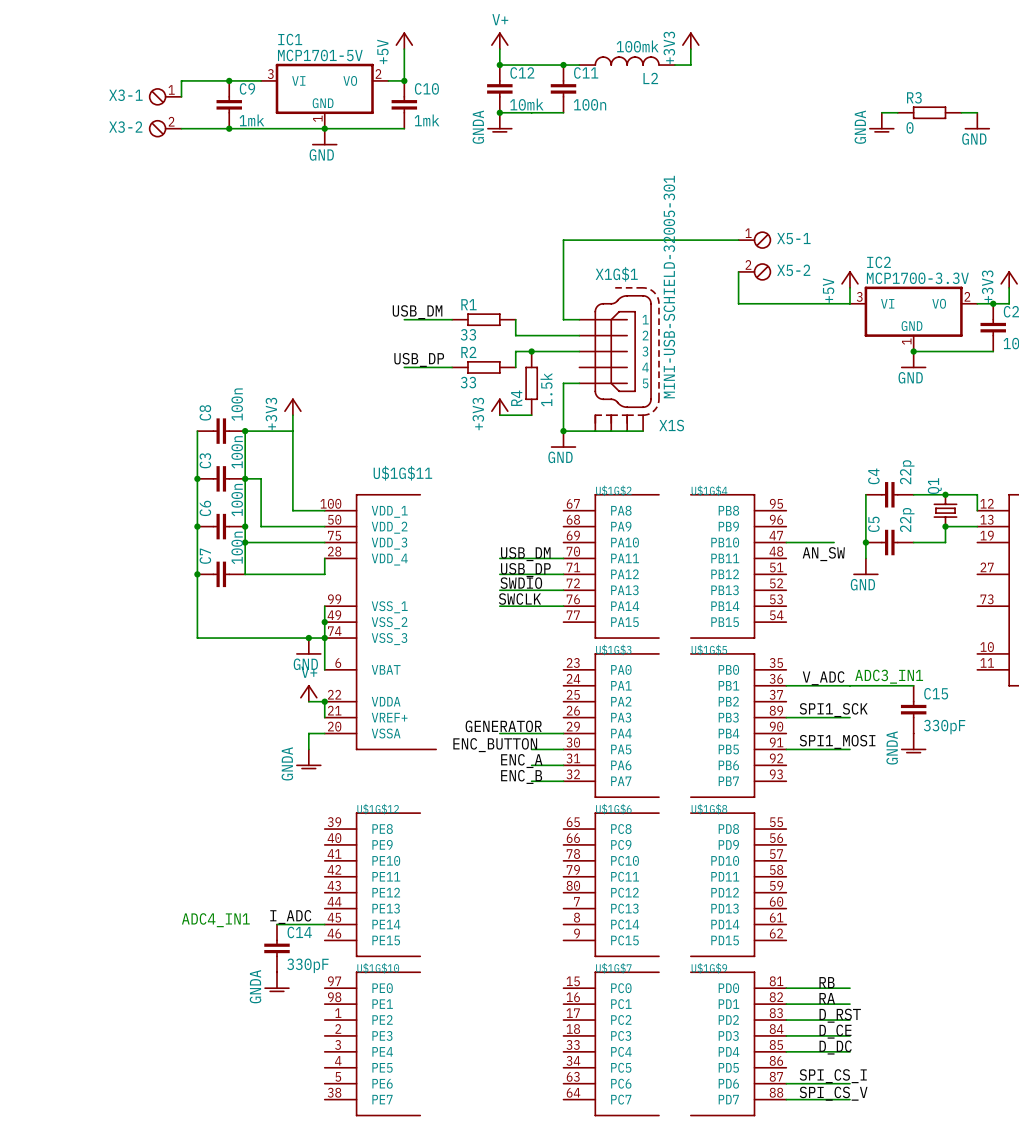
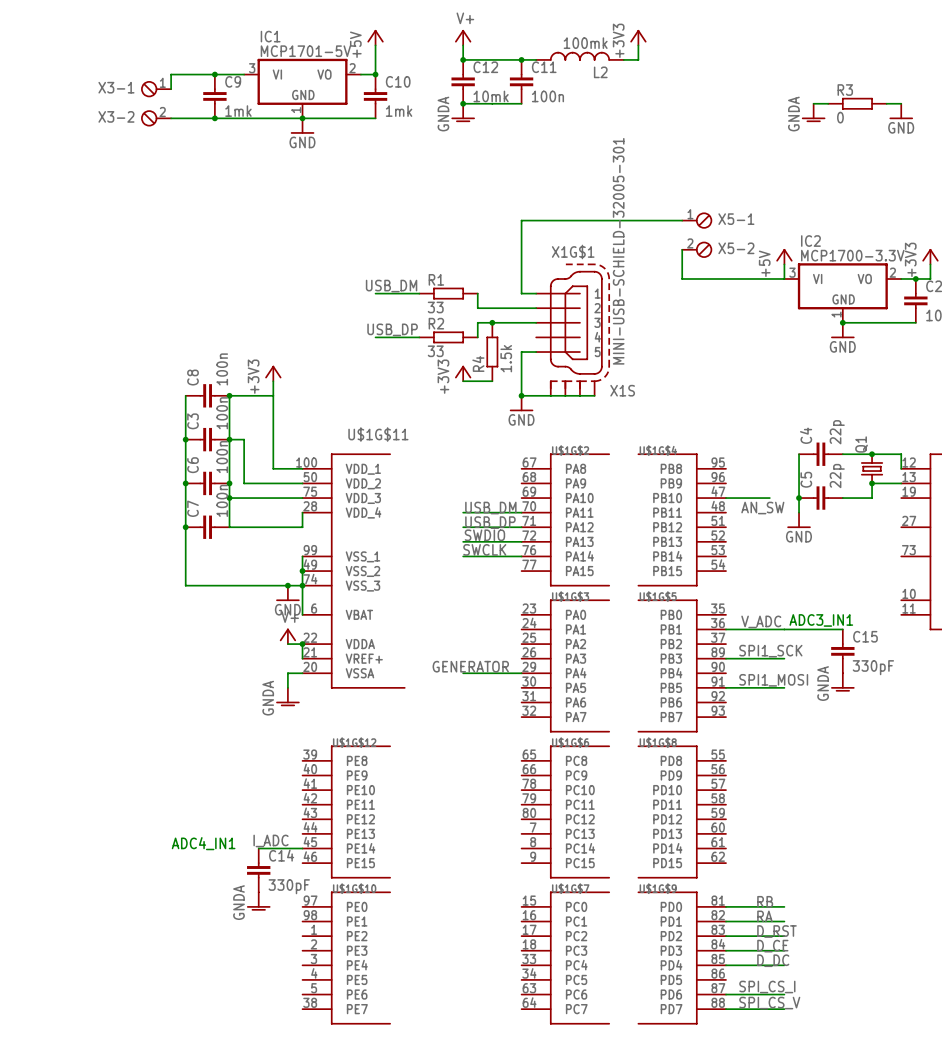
label: ENC_BUTTON (495, 745) -> none
wire: (531, 749) (563, 749) -> none
label: ENC_A (521, 761) -> none
wire: (531, 765) (563, 765) -> none
label: ENC_B (521, 776) -> none
wire: (531, 781) (563, 781) -> none

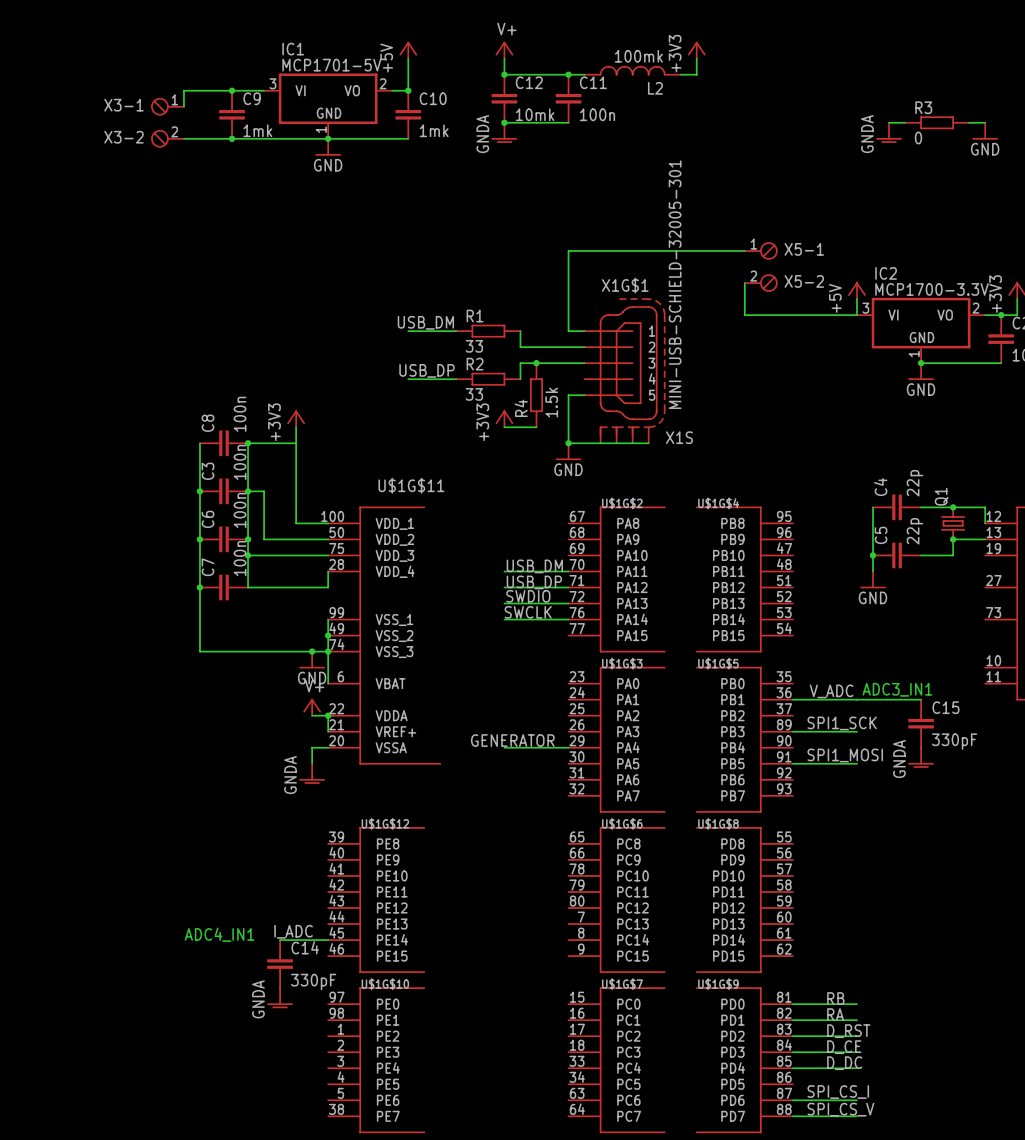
wire: (726, 498) (769, 498) -> none
label: AN_SW (762, 508) -> none

